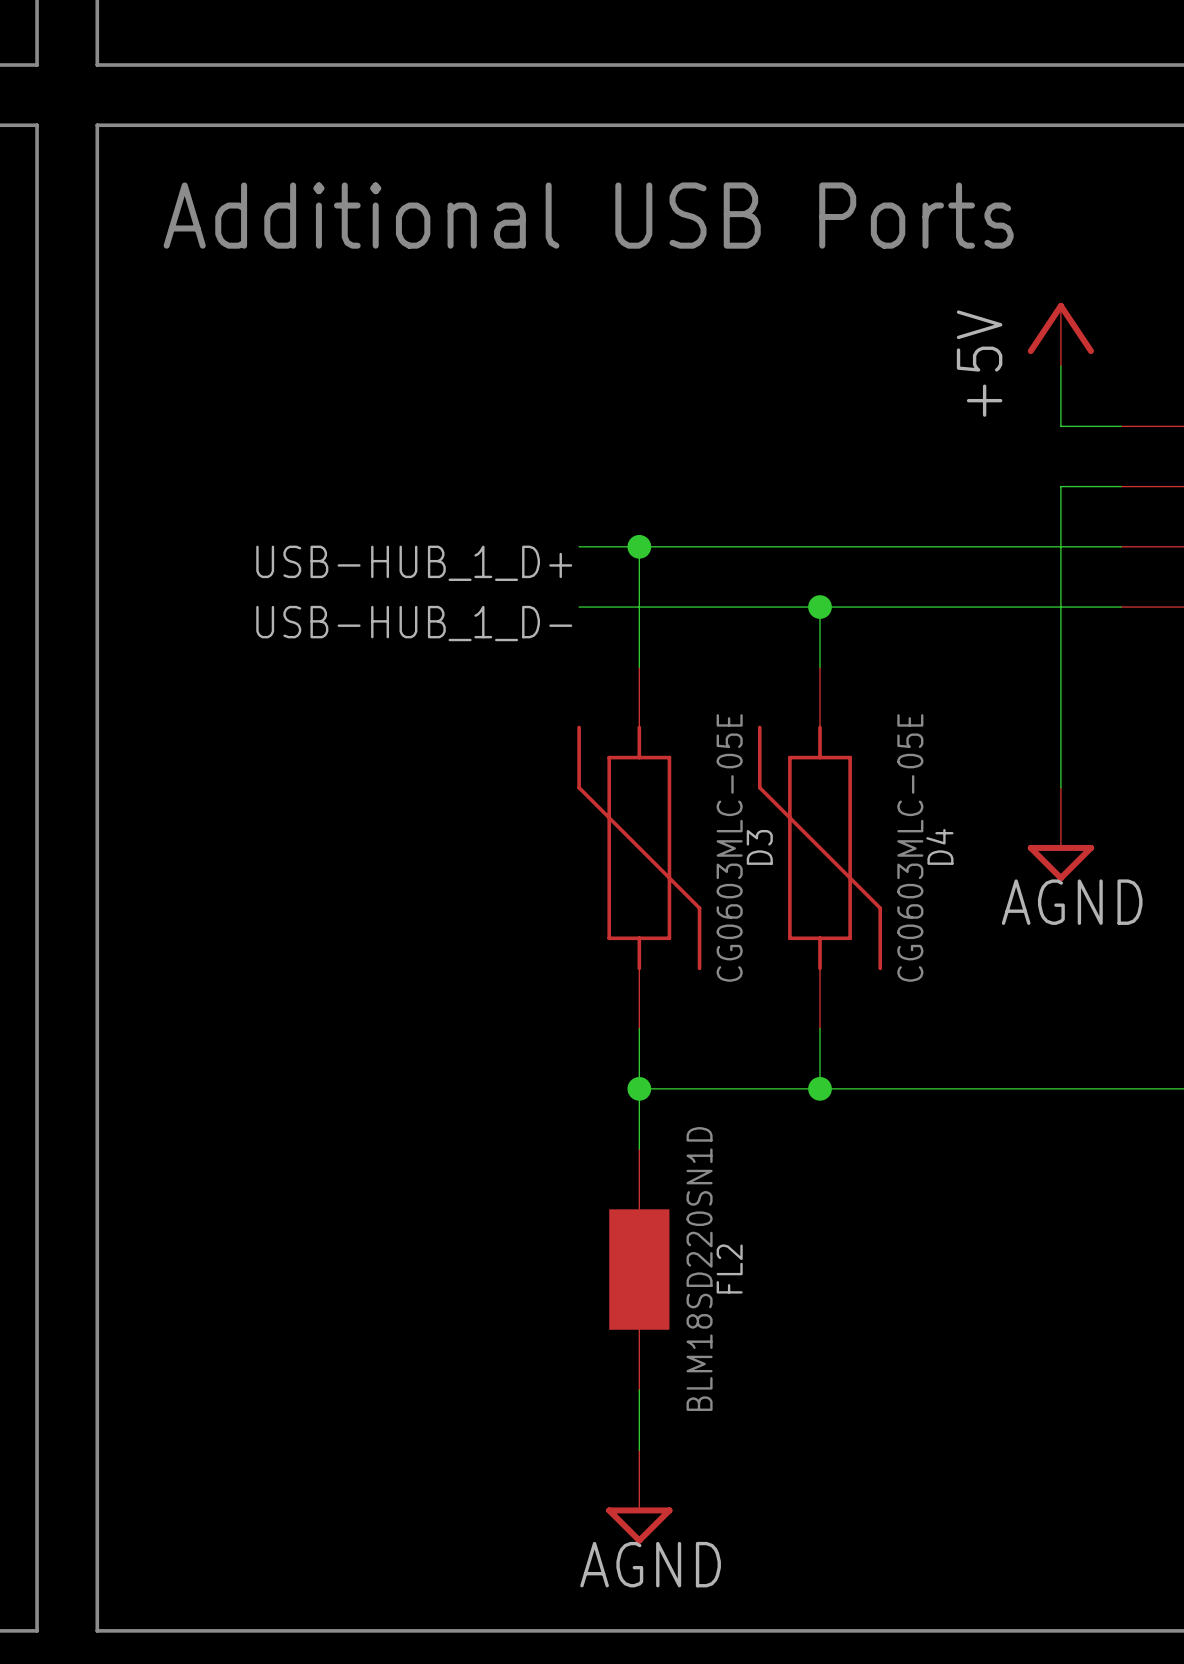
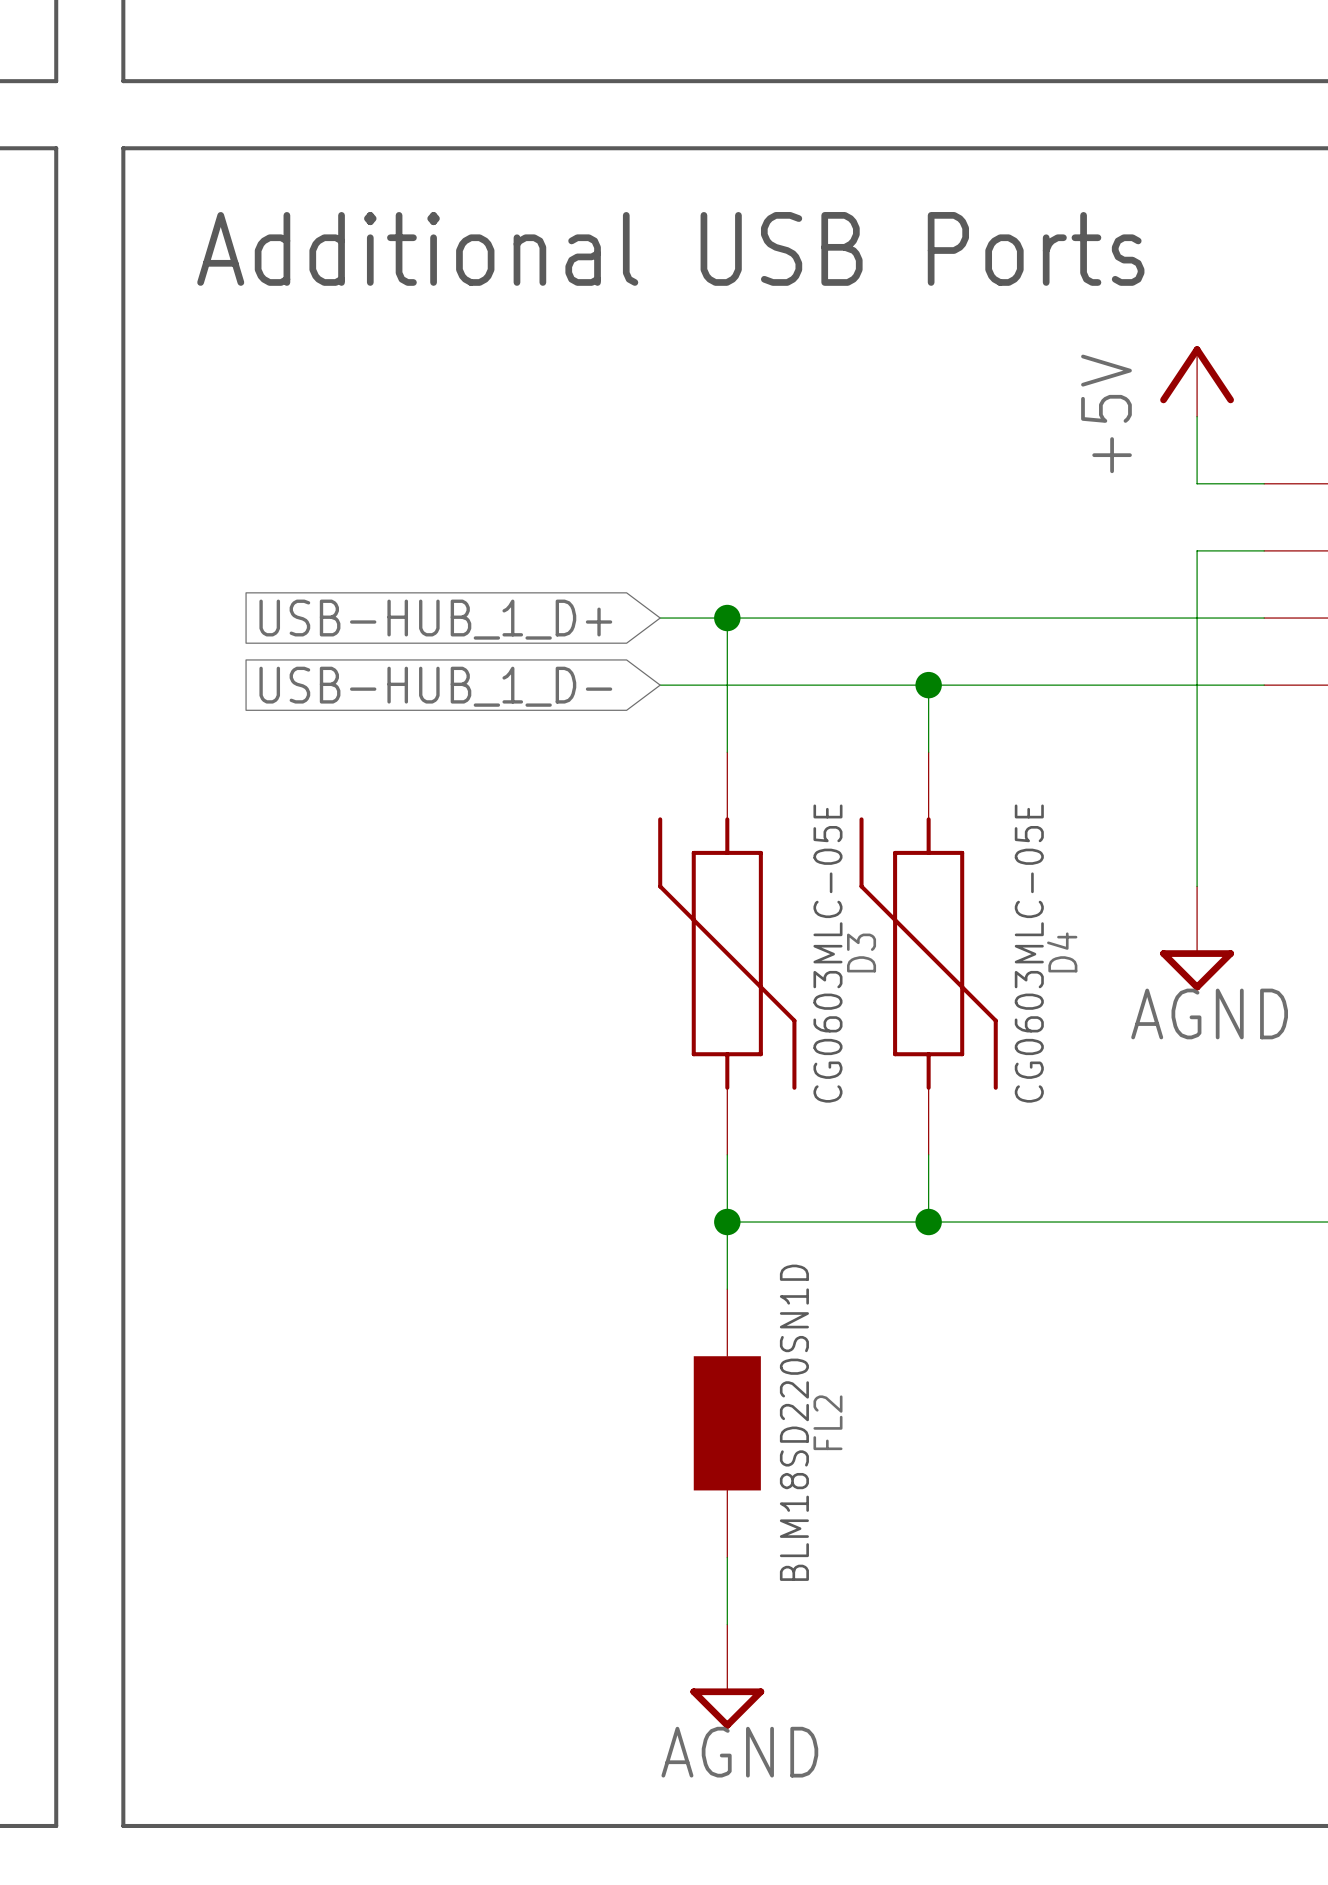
global label: none -> USB-HUB_1_D+ (435, 619)
label: USB-HUB_1_D+ (414, 563) -> none
global label: none -> USB-HUB_1_D- (435, 686)
label: USB-HUB_1_D- (414, 623) -> none

